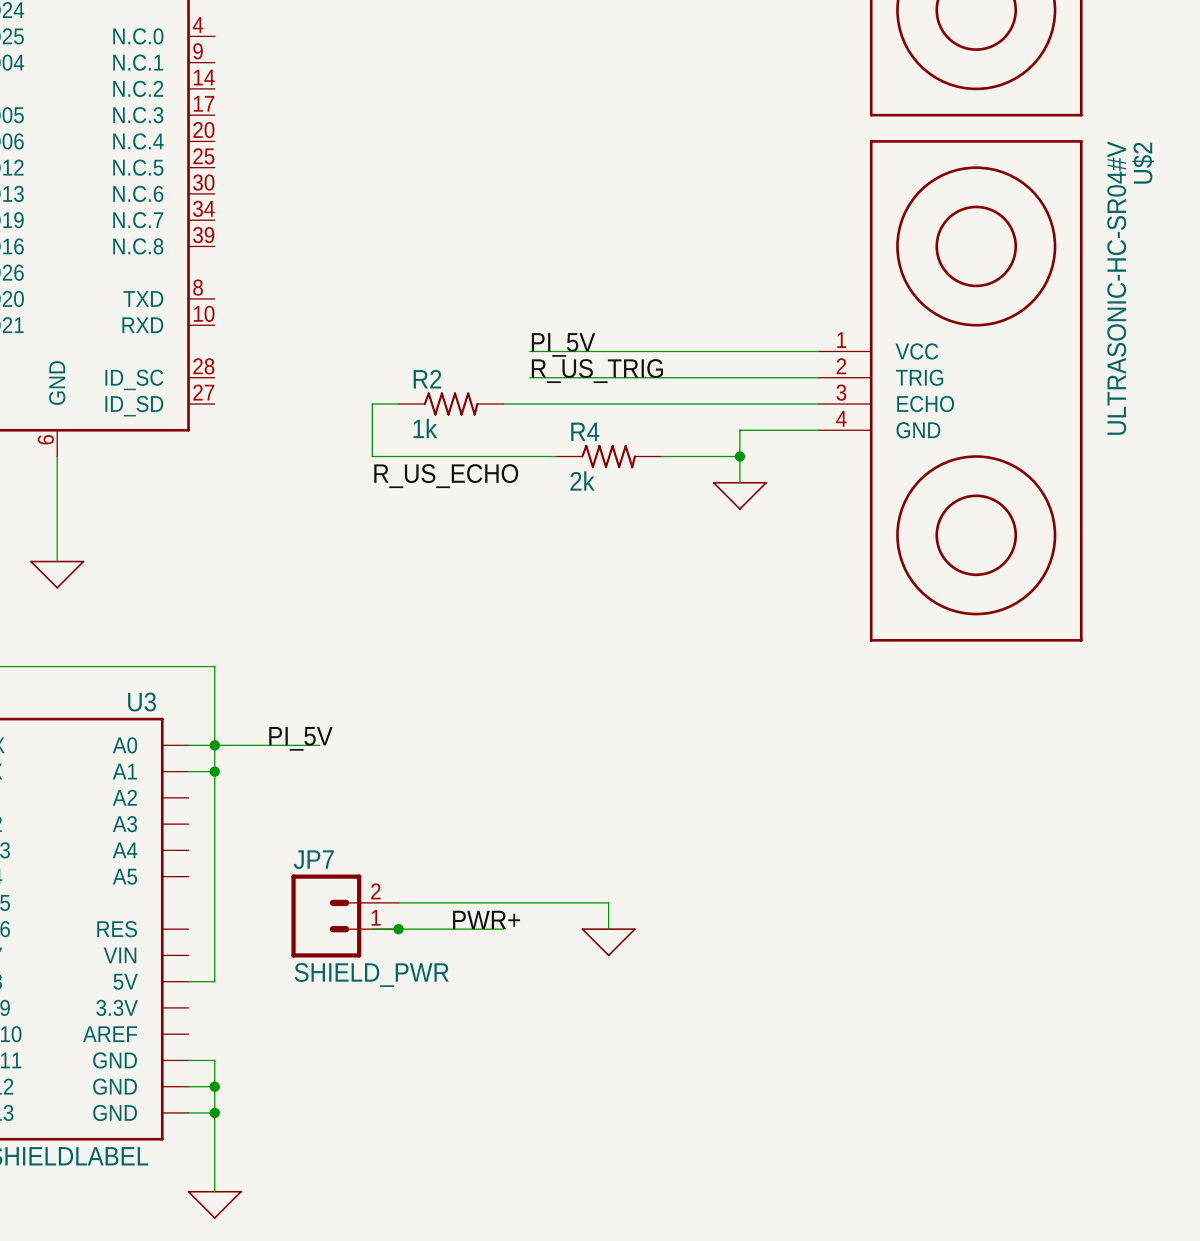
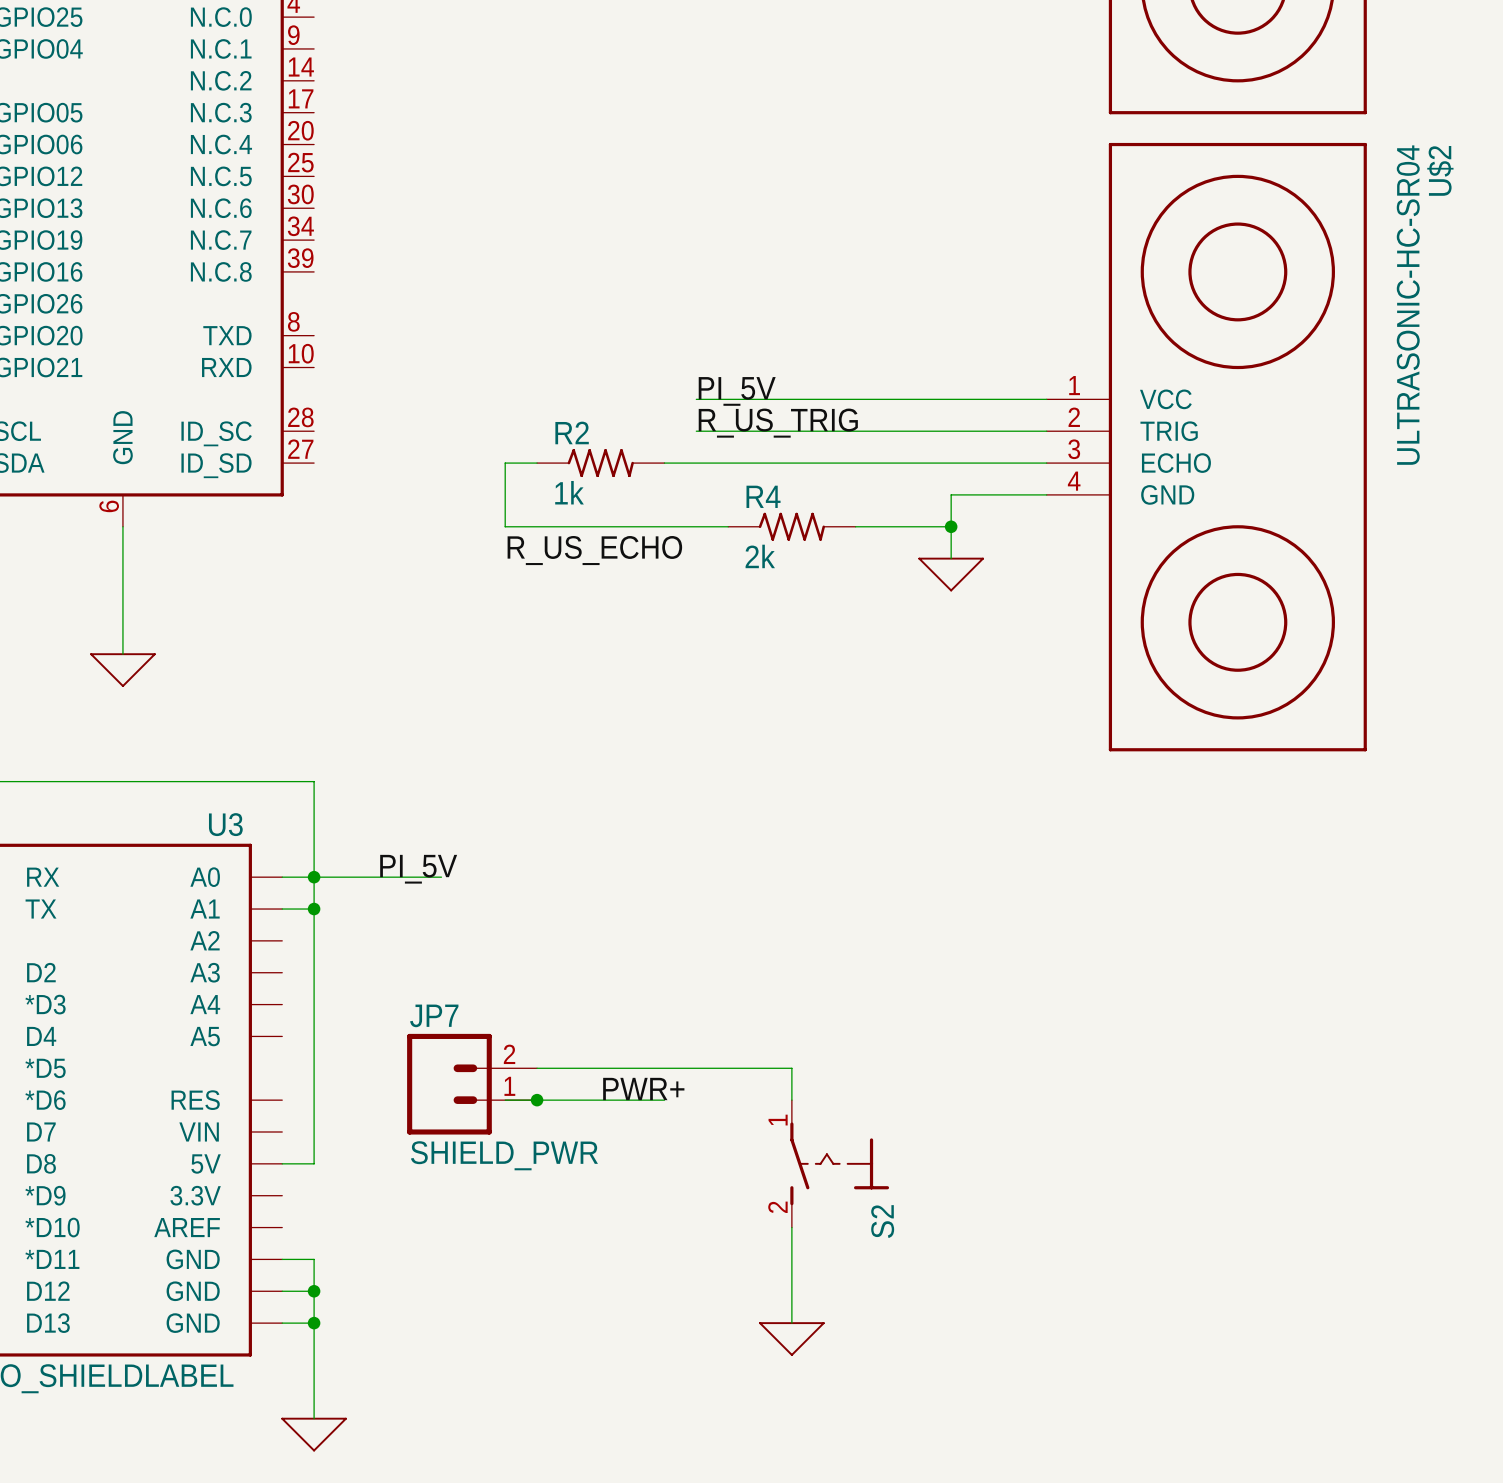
U$2 value: ULTRASONIC-HC-SR04#V (1116, 288) -> ULTRASONIC-HC-SR04 (1408, 305)
power symbol position: (608, 942) -> (791, 1339)
S2: none -> (839, 1163)
wire: none -> (791, 1227) (791, 1323)

